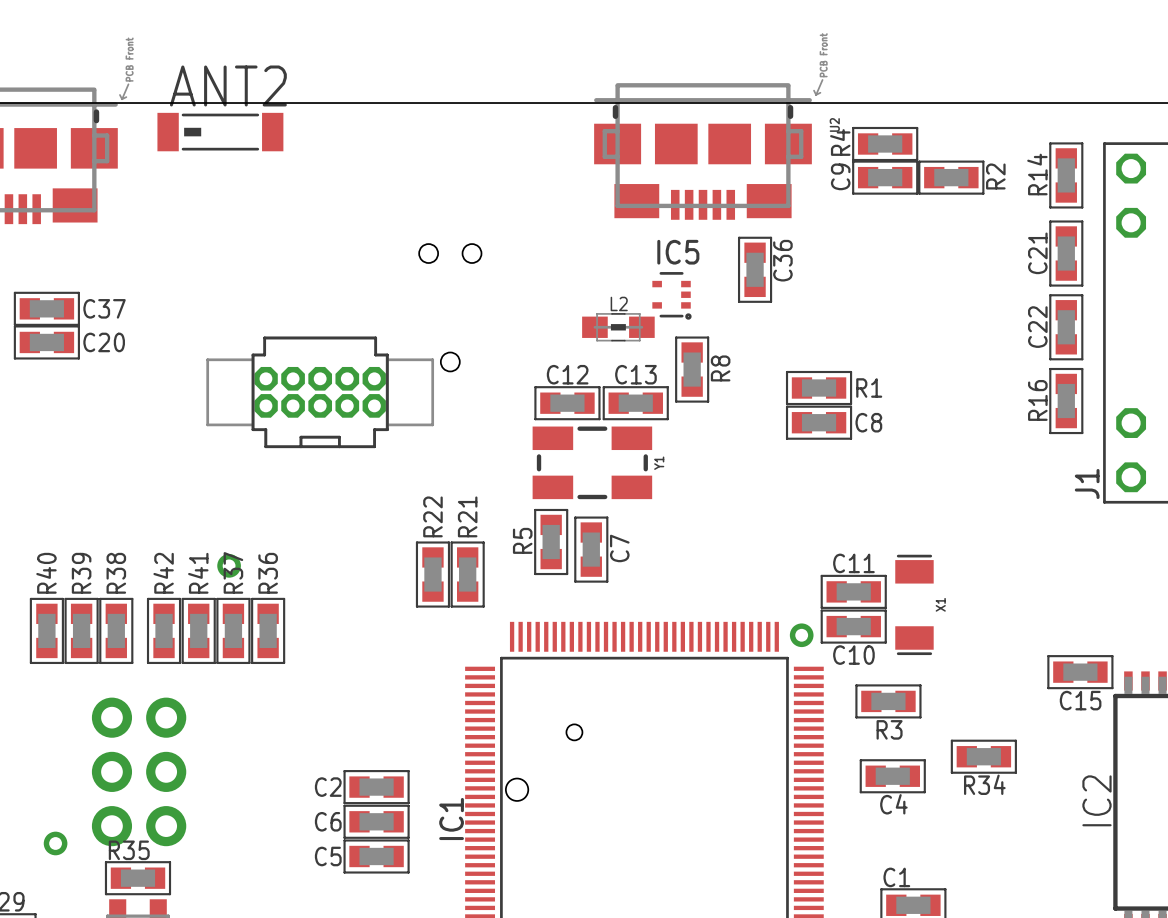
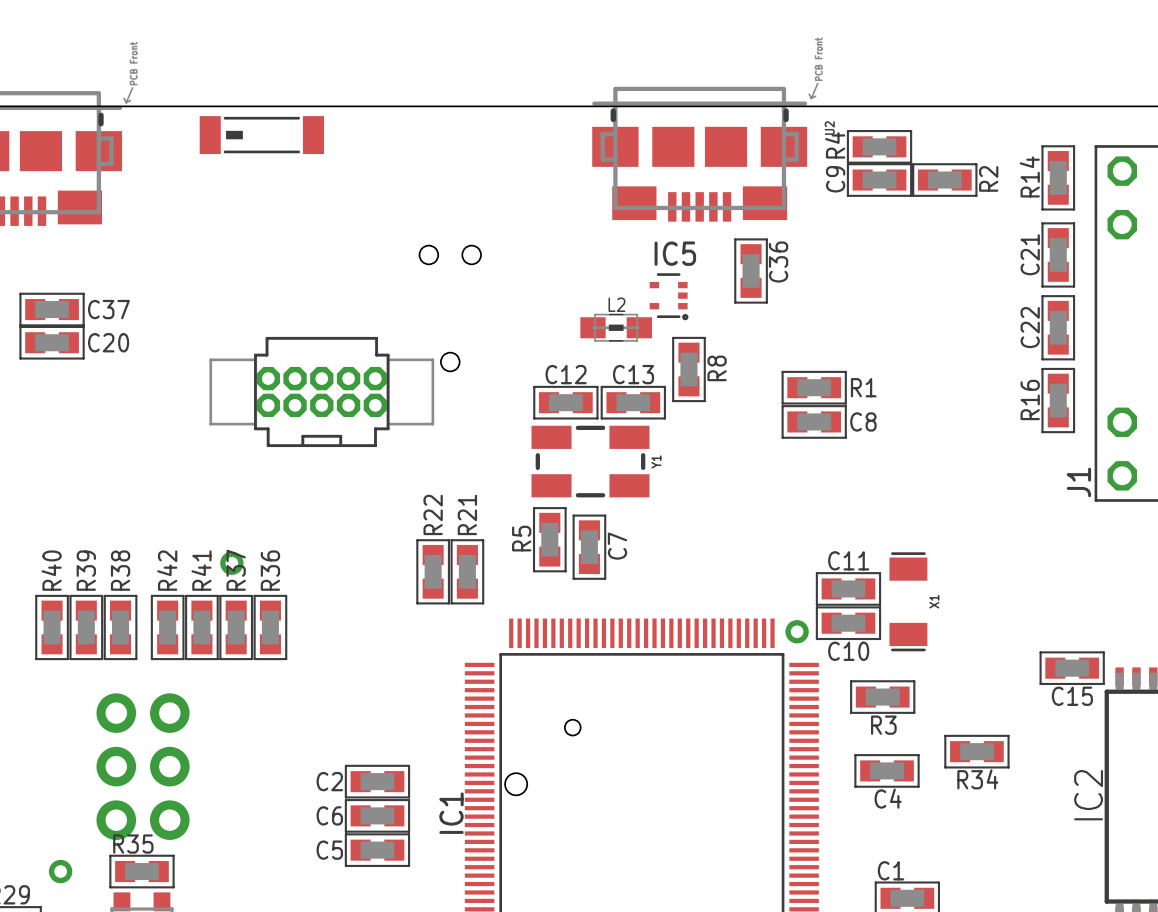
ANT2: (220, 132) -> none
part: none -> (261, 135)
part position: (55, 843) -> (60, 871)

